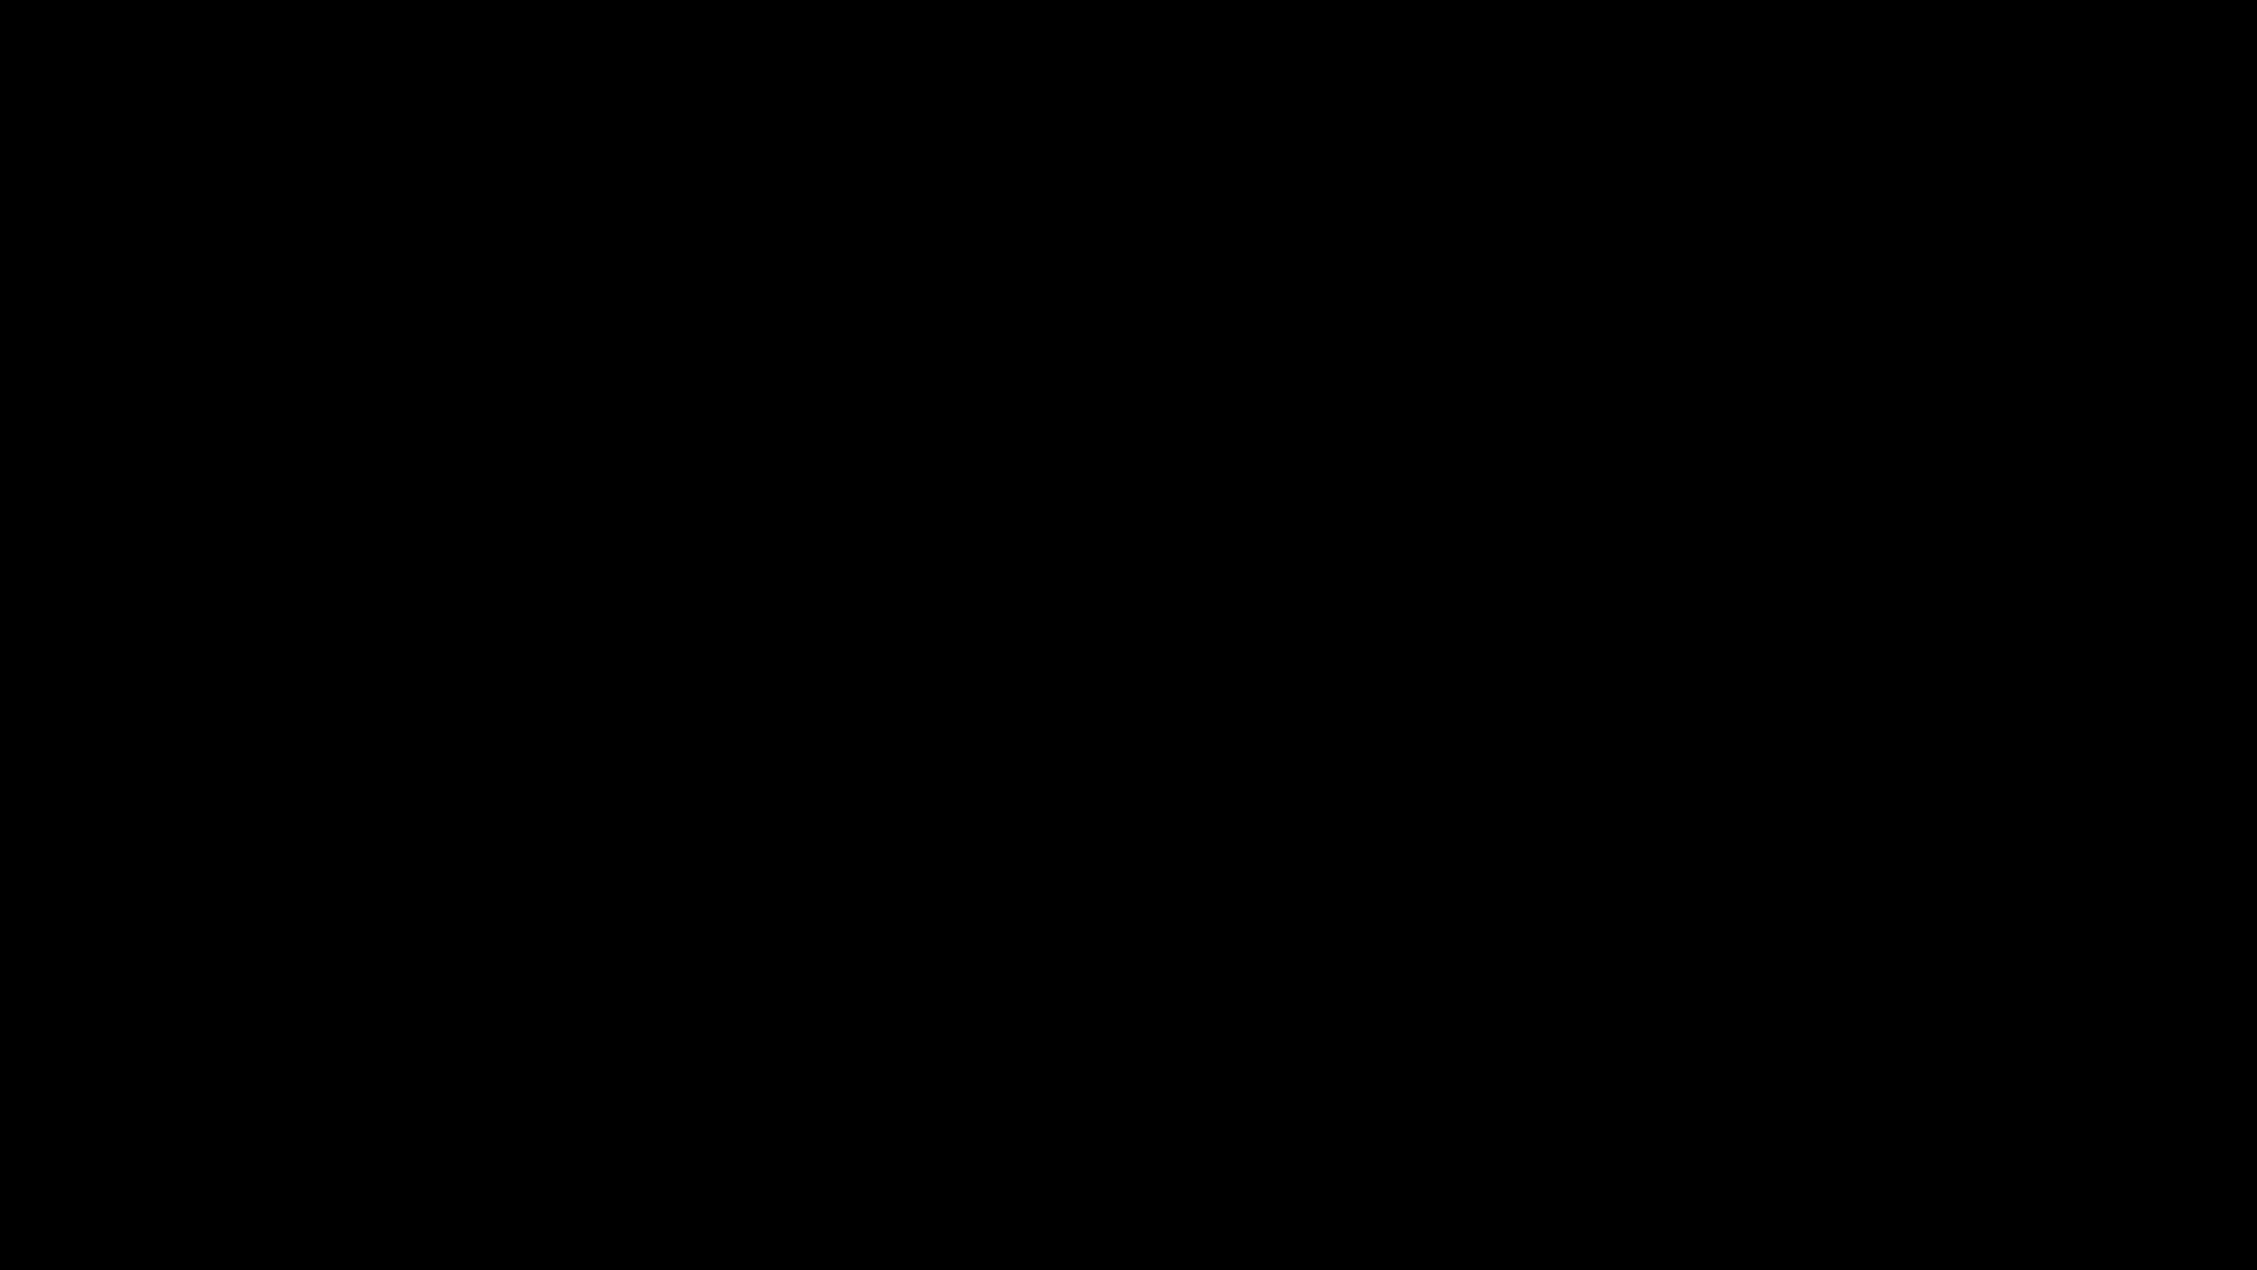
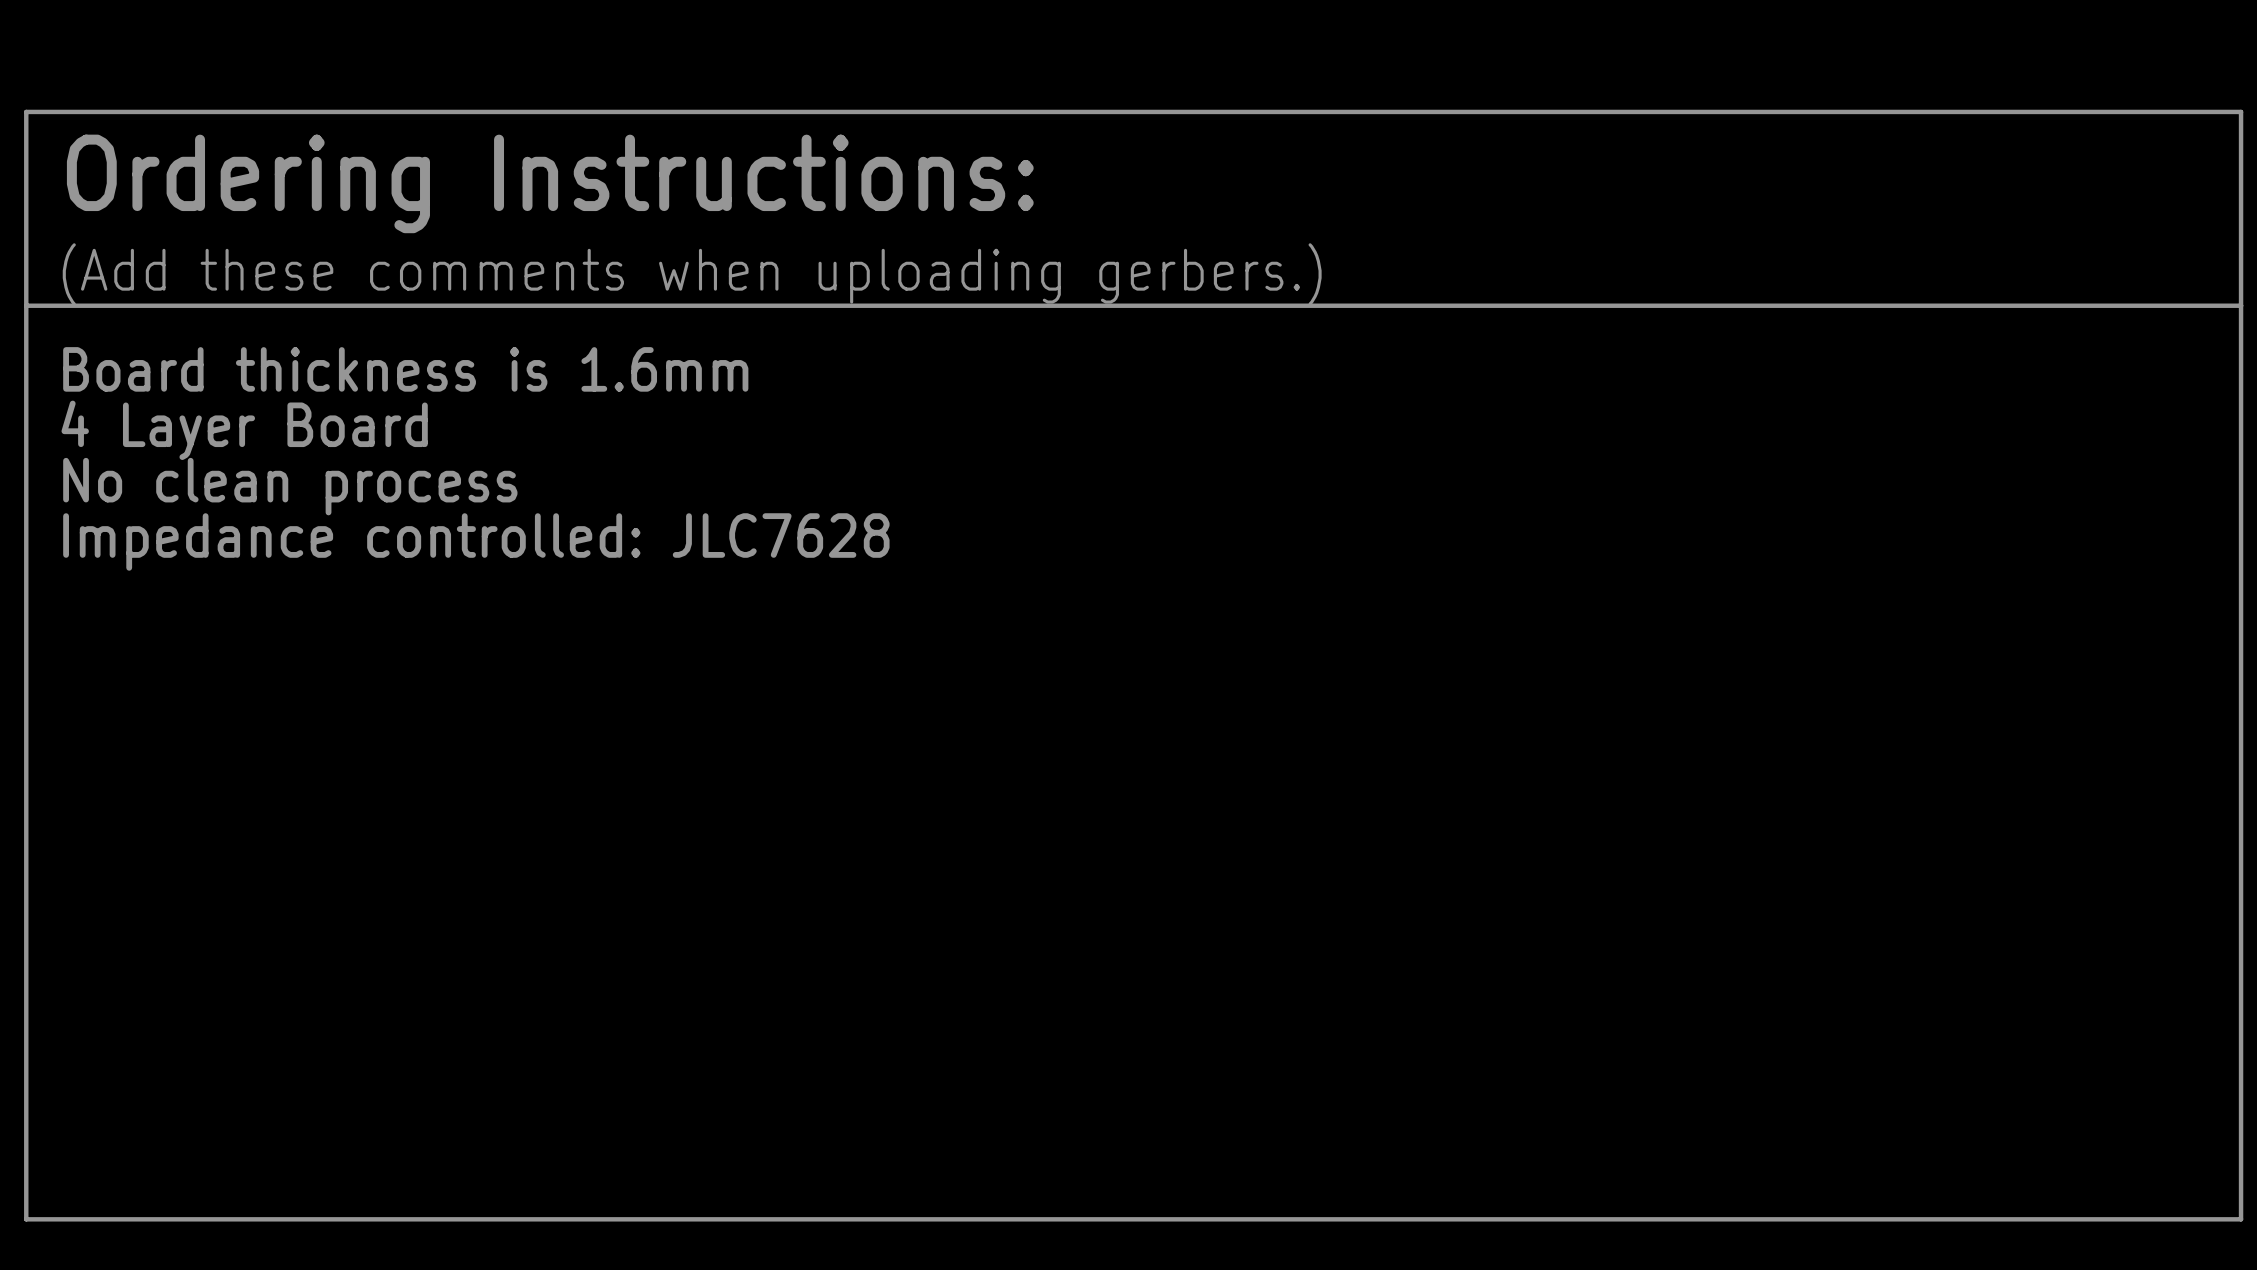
drawing: none -> [24, 109, 2244, 1222]
text: none -> Board thickness is 1.6mm (405, 369)
text: none -> 4 Layer Board (244, 430)
text: none -> No clean process (290, 486)
text: none -> Impedance controlled: JLC7628 (476, 541)

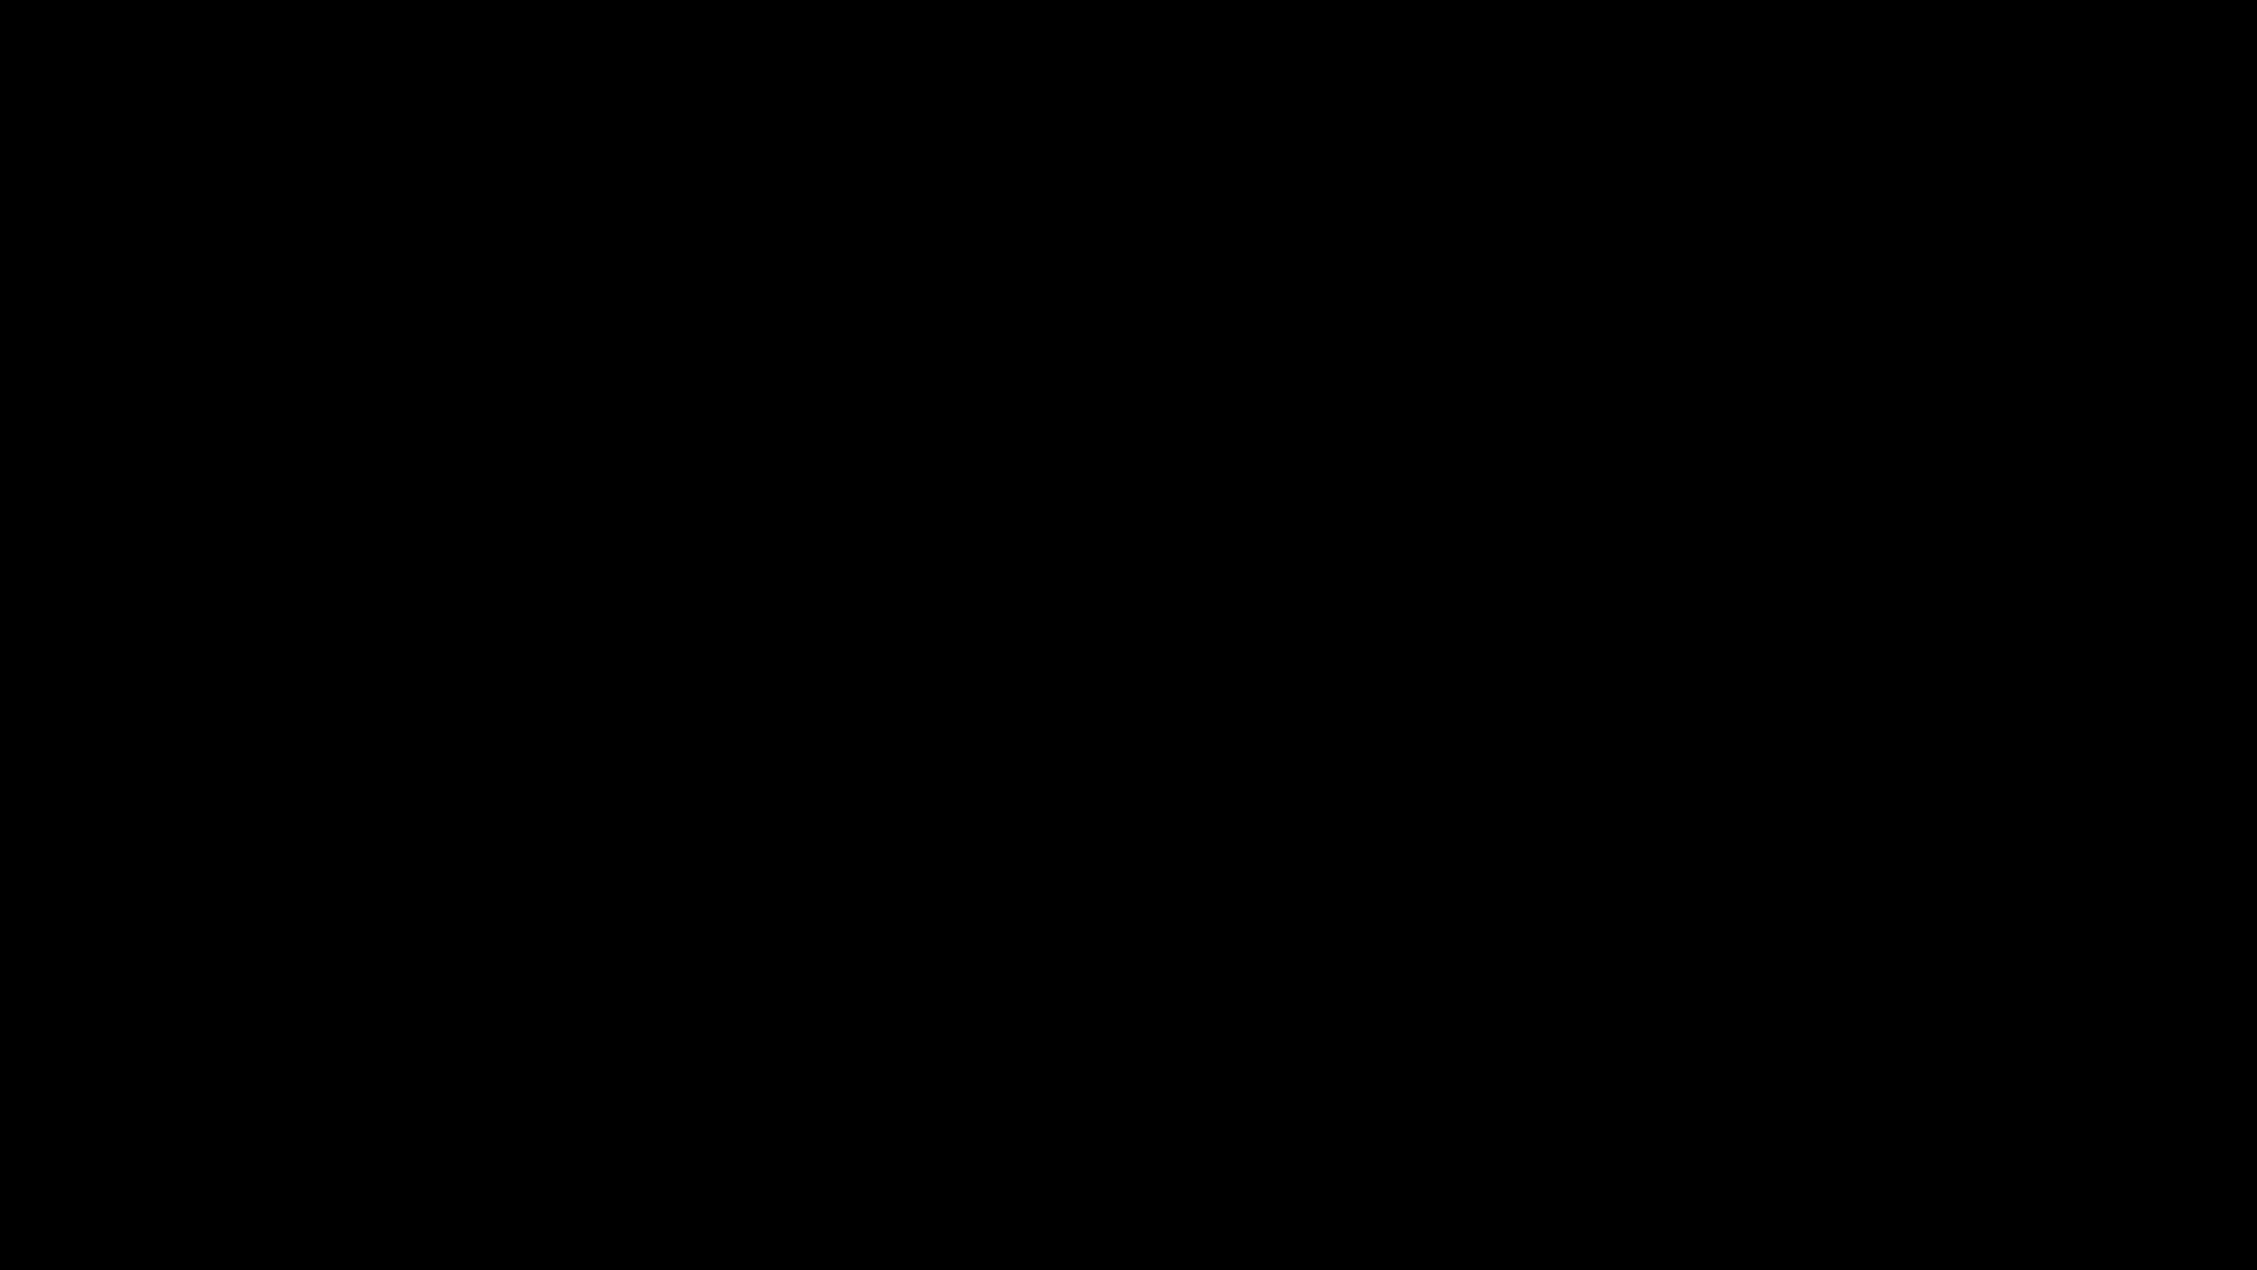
drawing: [24, 109, 2244, 1222] -> none
text: Board thickness is 1.6mm (405, 369) -> none
text: 4 Layer Board (244, 430) -> none
text: No clean process (290, 486) -> none
text: Impedance controlled: JLC7628 (476, 541) -> none

